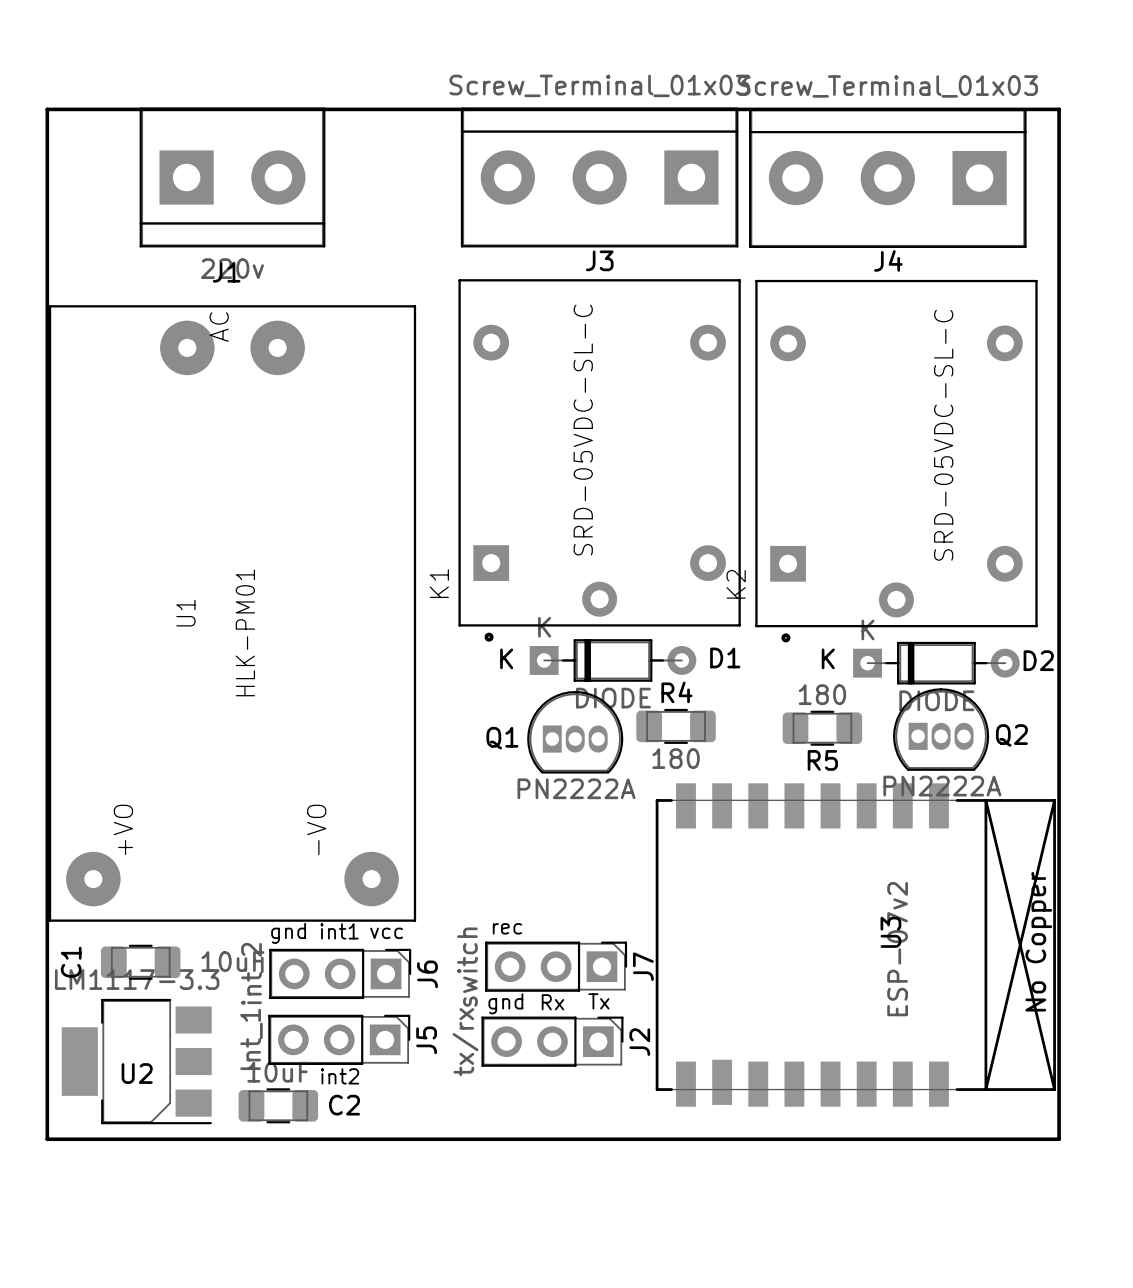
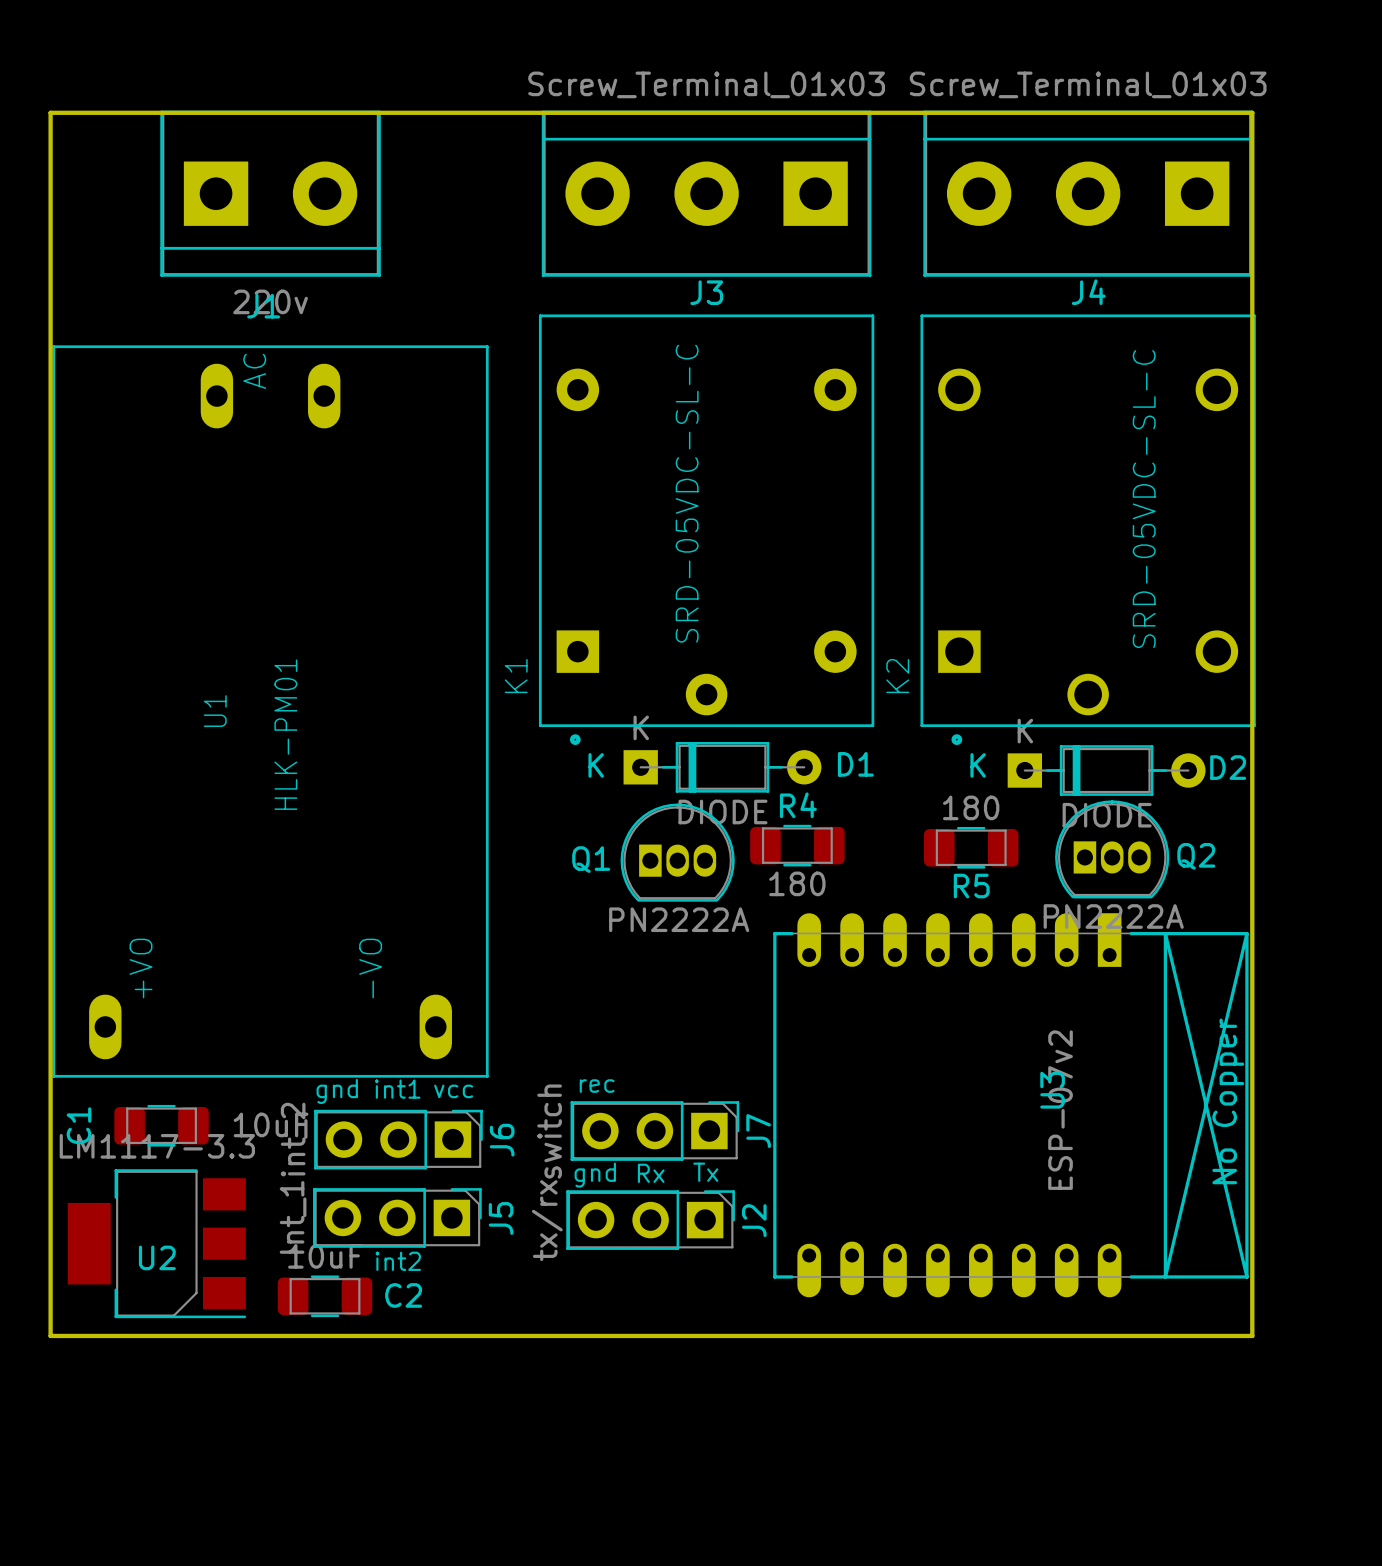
J4 position: (887, 178) -> (1088, 193)
K2 footprint: [755, 279, 1038, 643] -> [920, 314, 1256, 745]
U1 footprint: [48, 305, 417, 922] -> [52, 345, 489, 1078]
U3 footprint: [655, 783, 1056, 1107] -> [773, 913, 1249, 1298]

